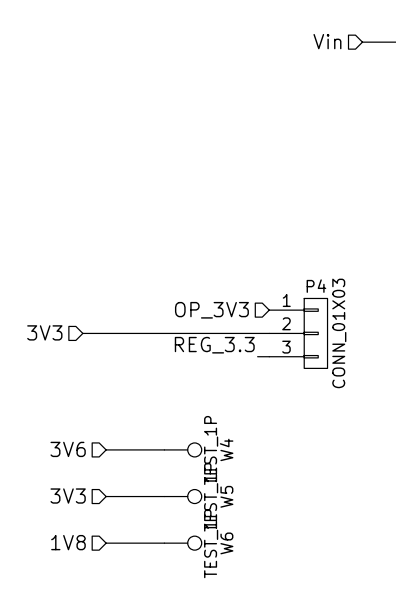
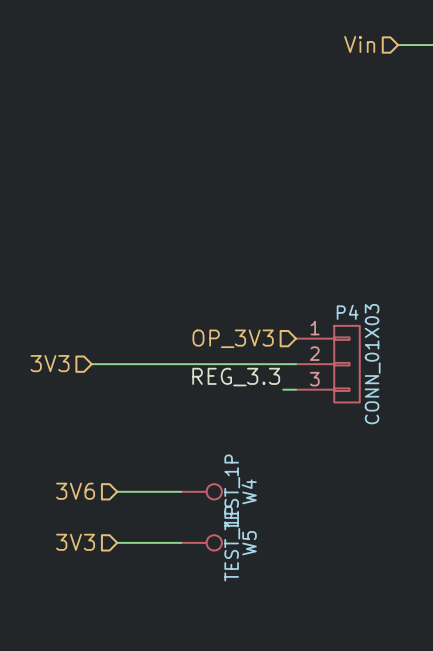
hierarchical label: 1V8 (68, 542) -> none
wire: (106, 543) (164, 543) -> none
W6: TEST_1P (183, 543) -> none

